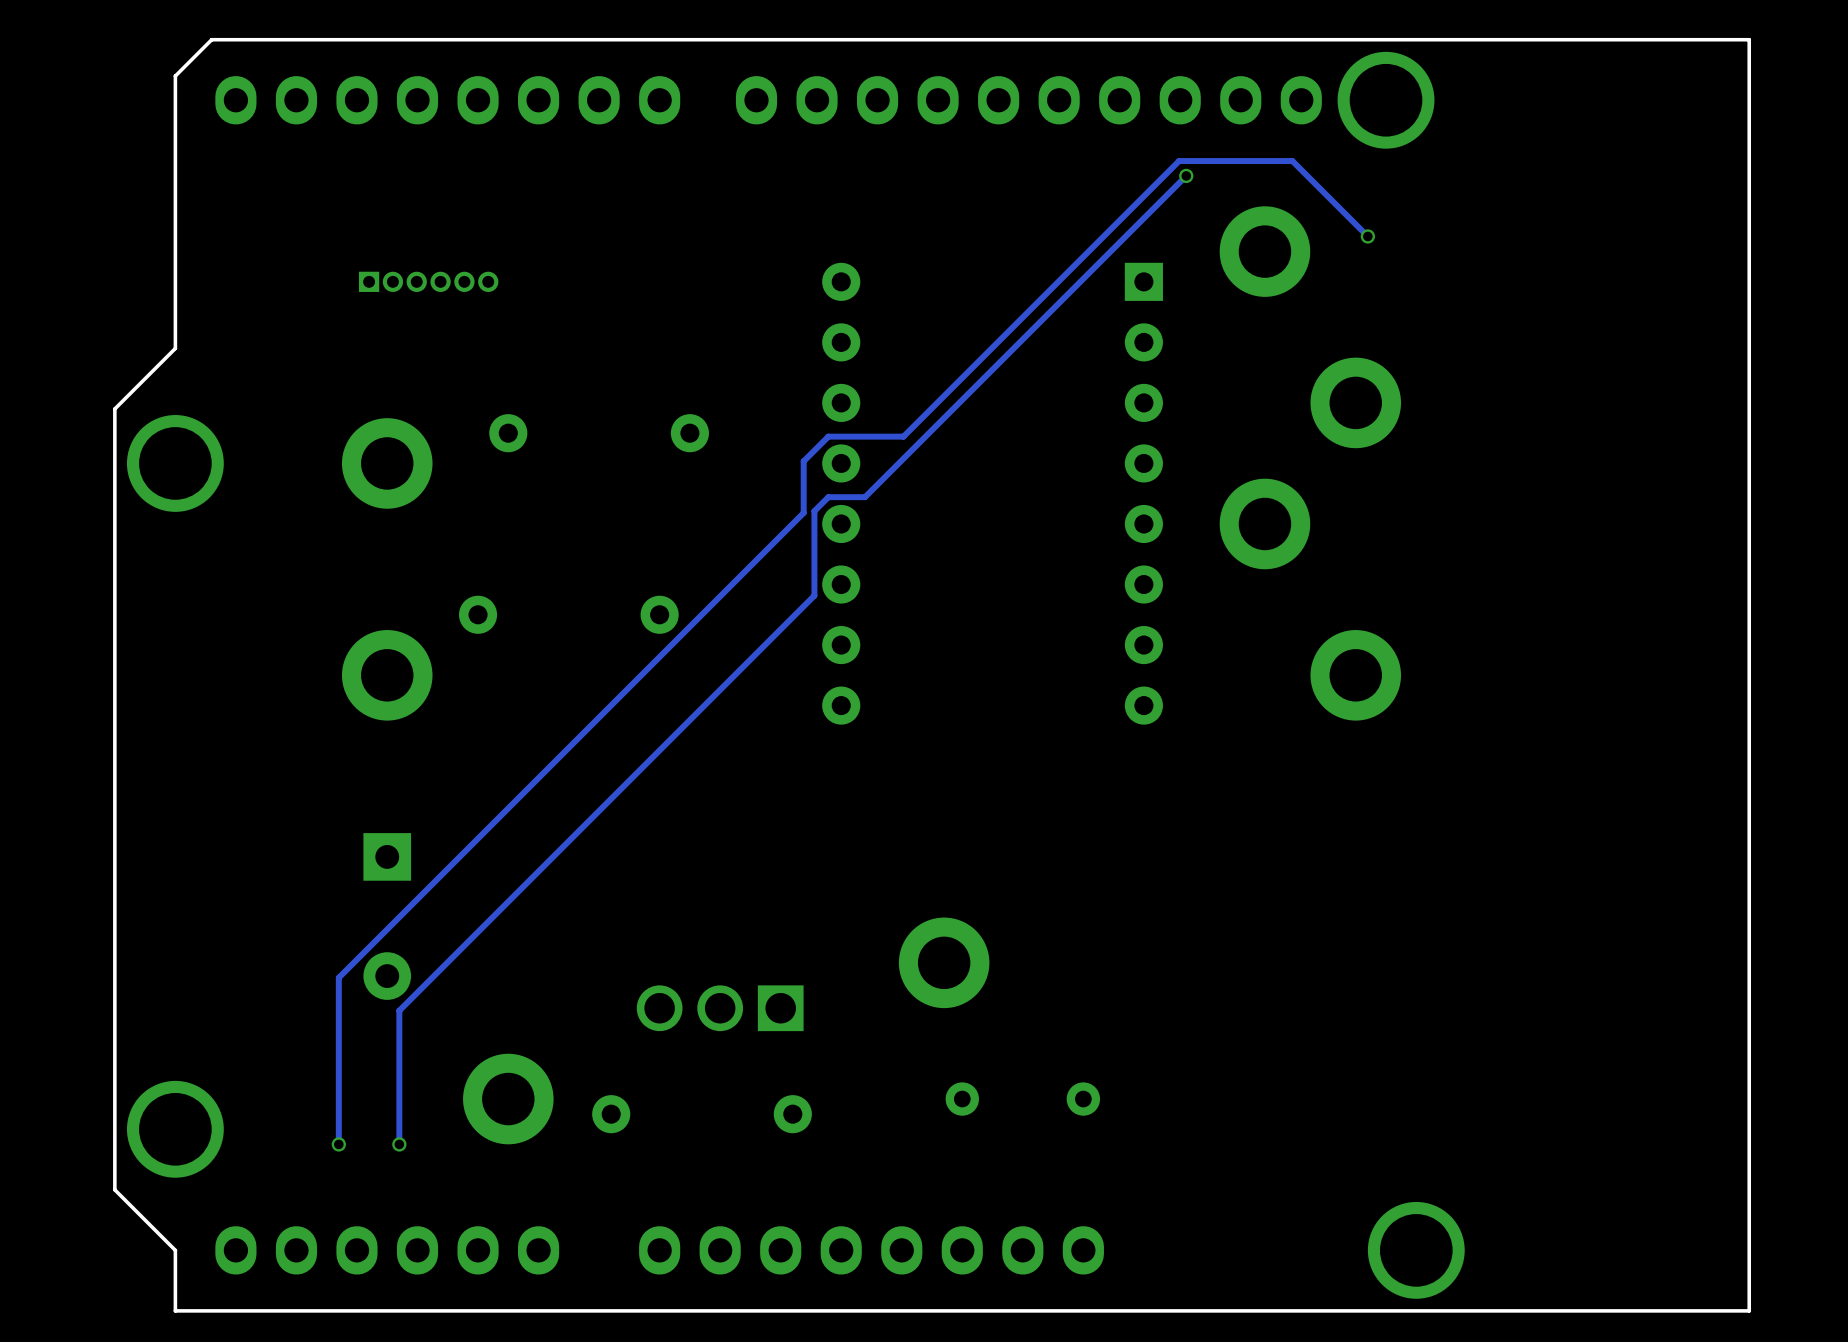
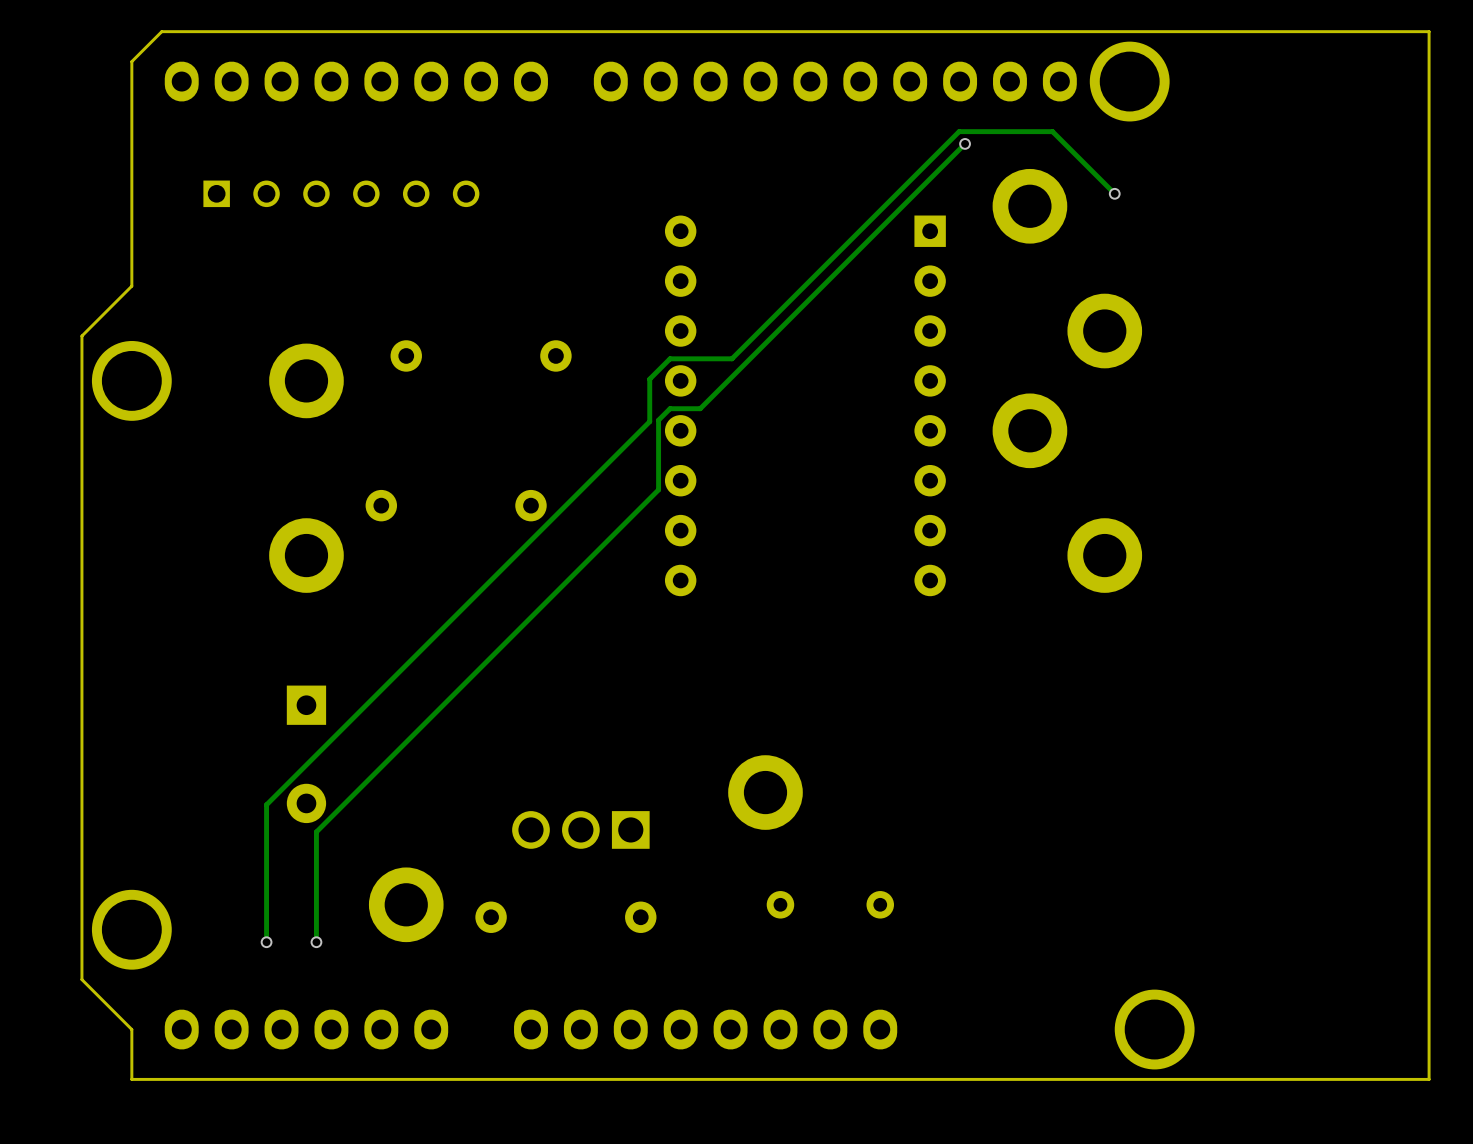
part: none -> (341, 193)
part: (428, 281) -> none

